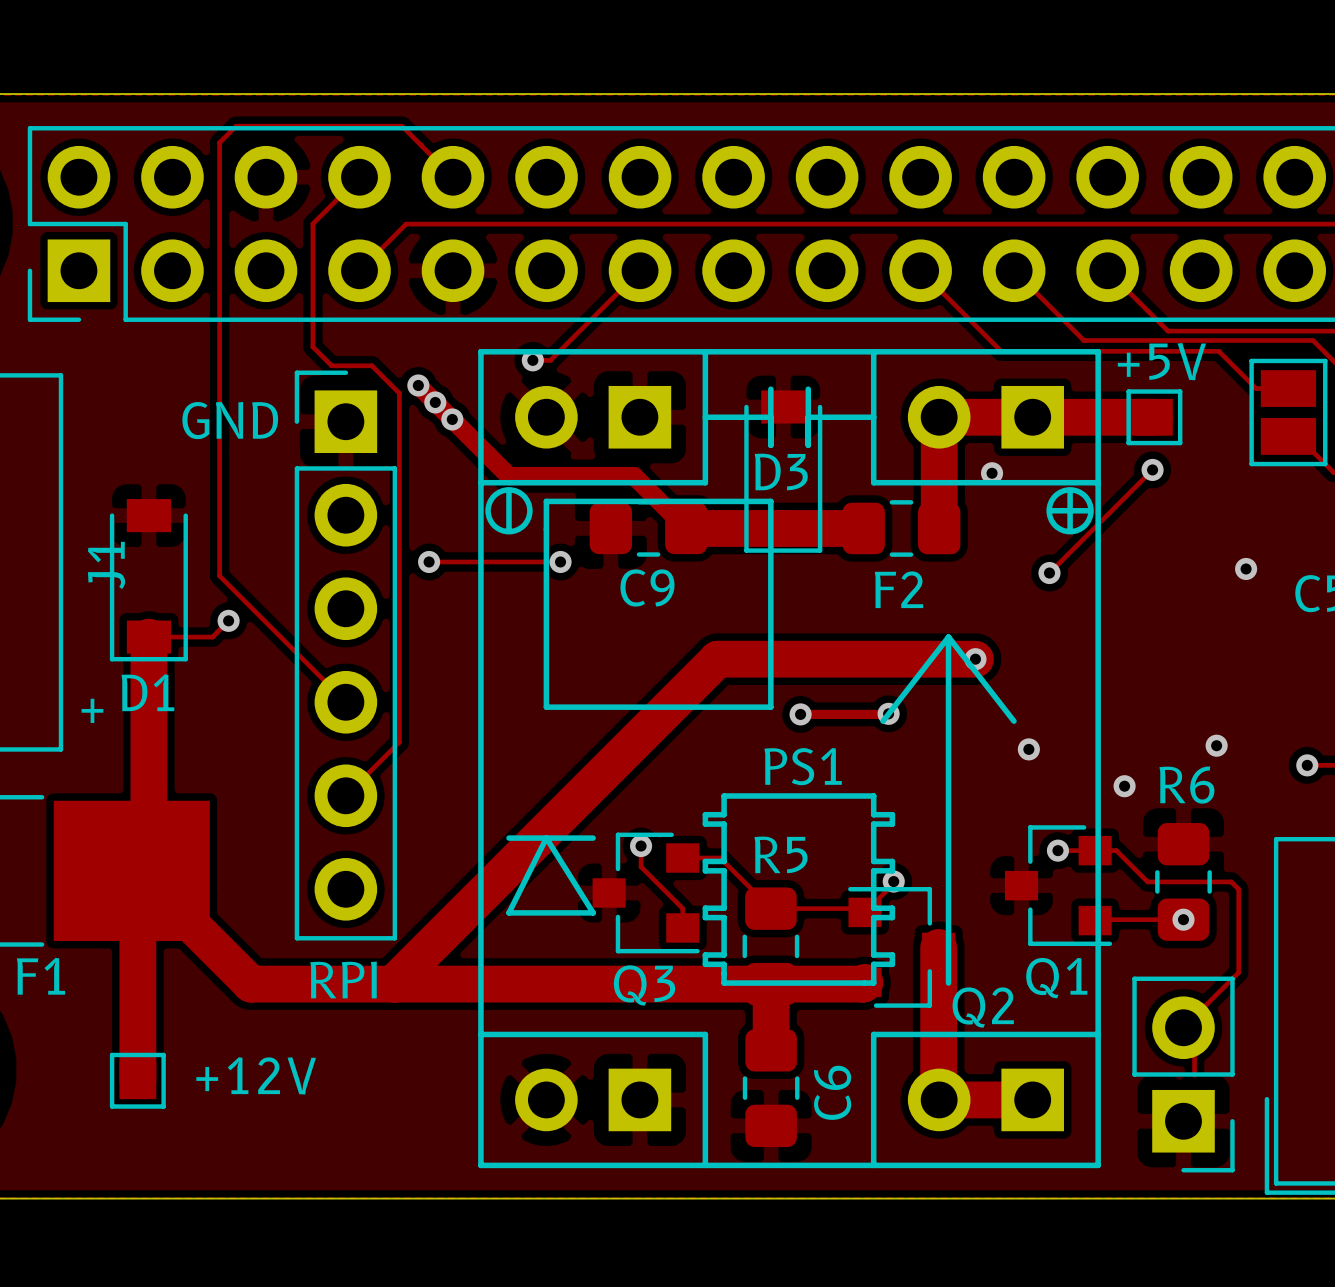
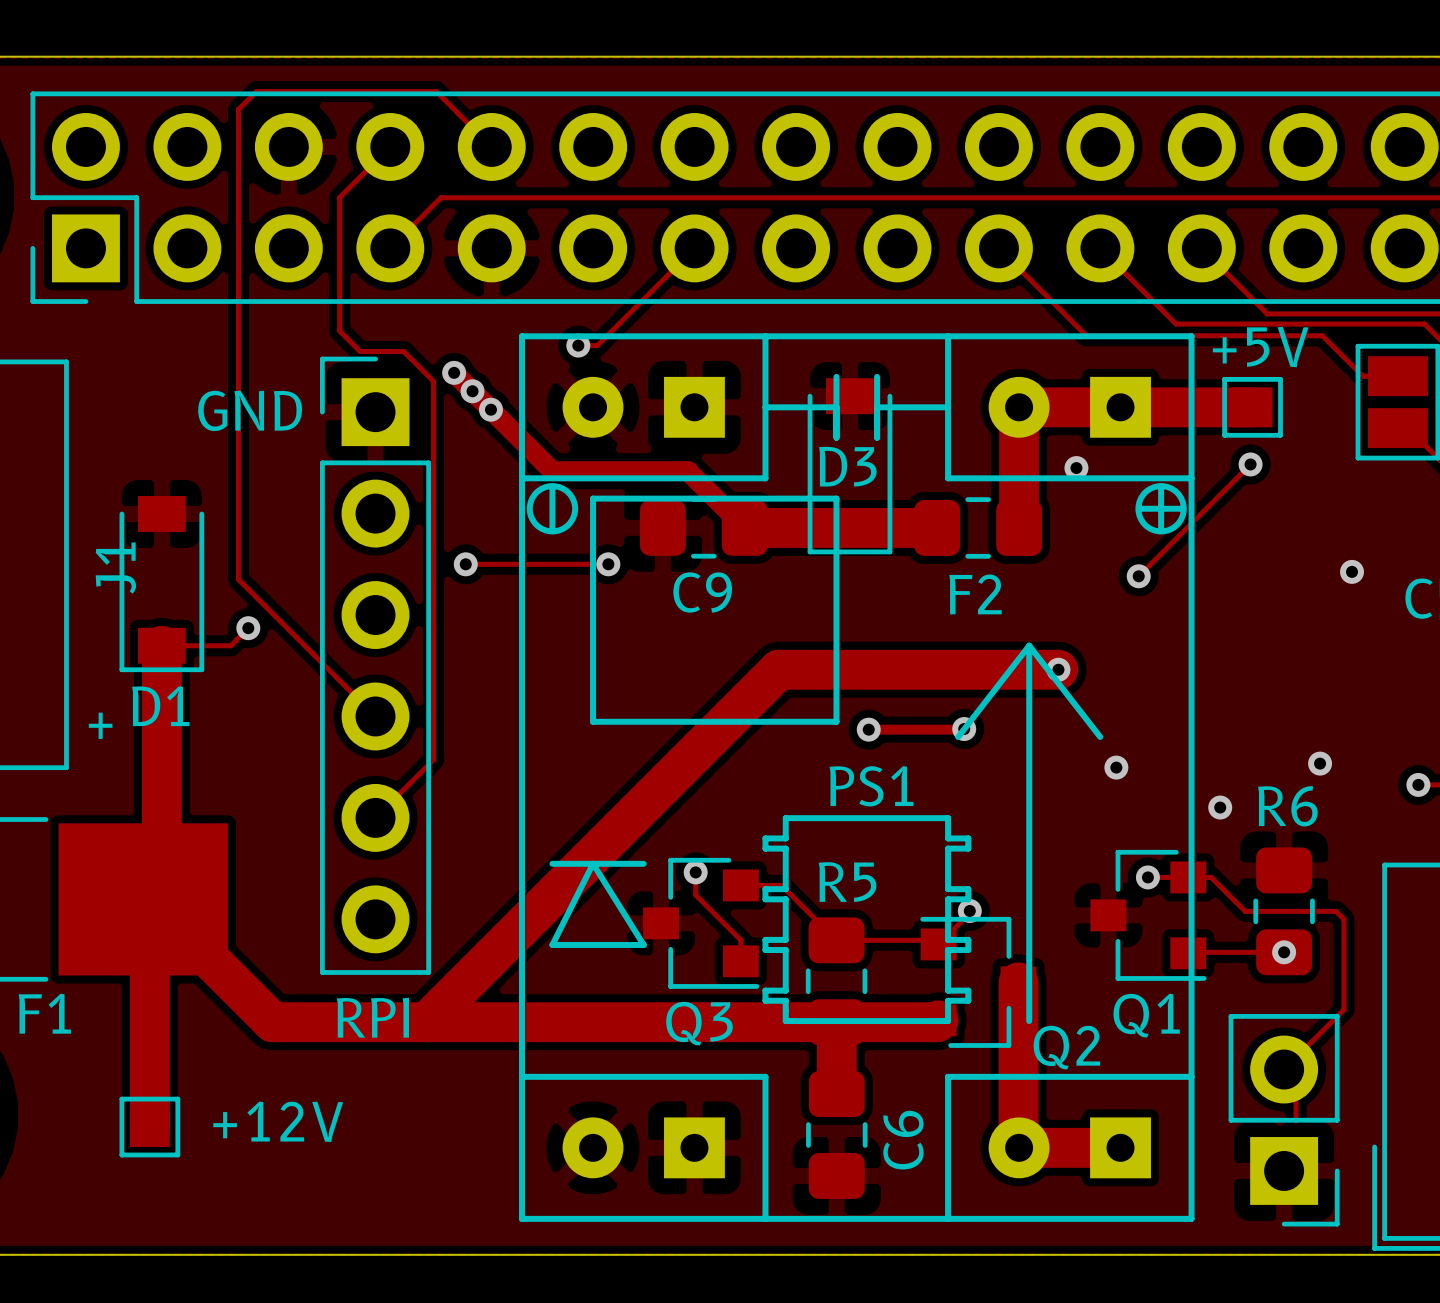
PS1 footprint: [478, 349, 1101, 1169] -> [519, 333, 1195, 1222]

